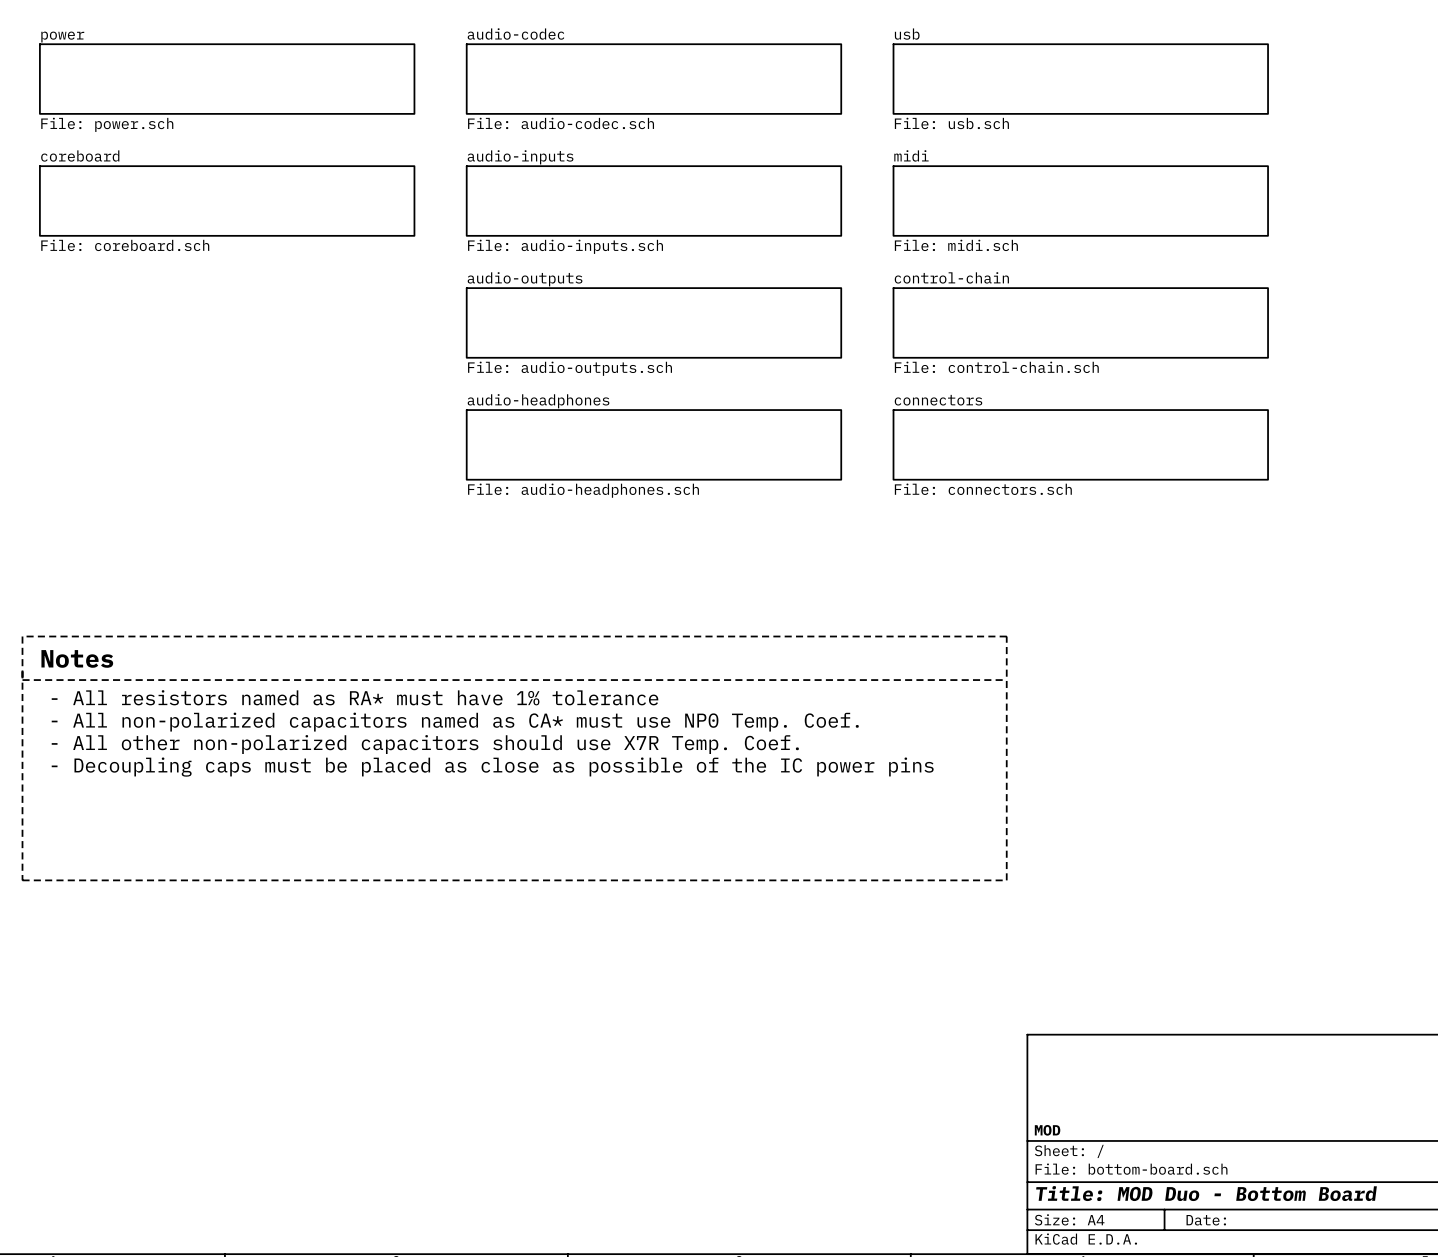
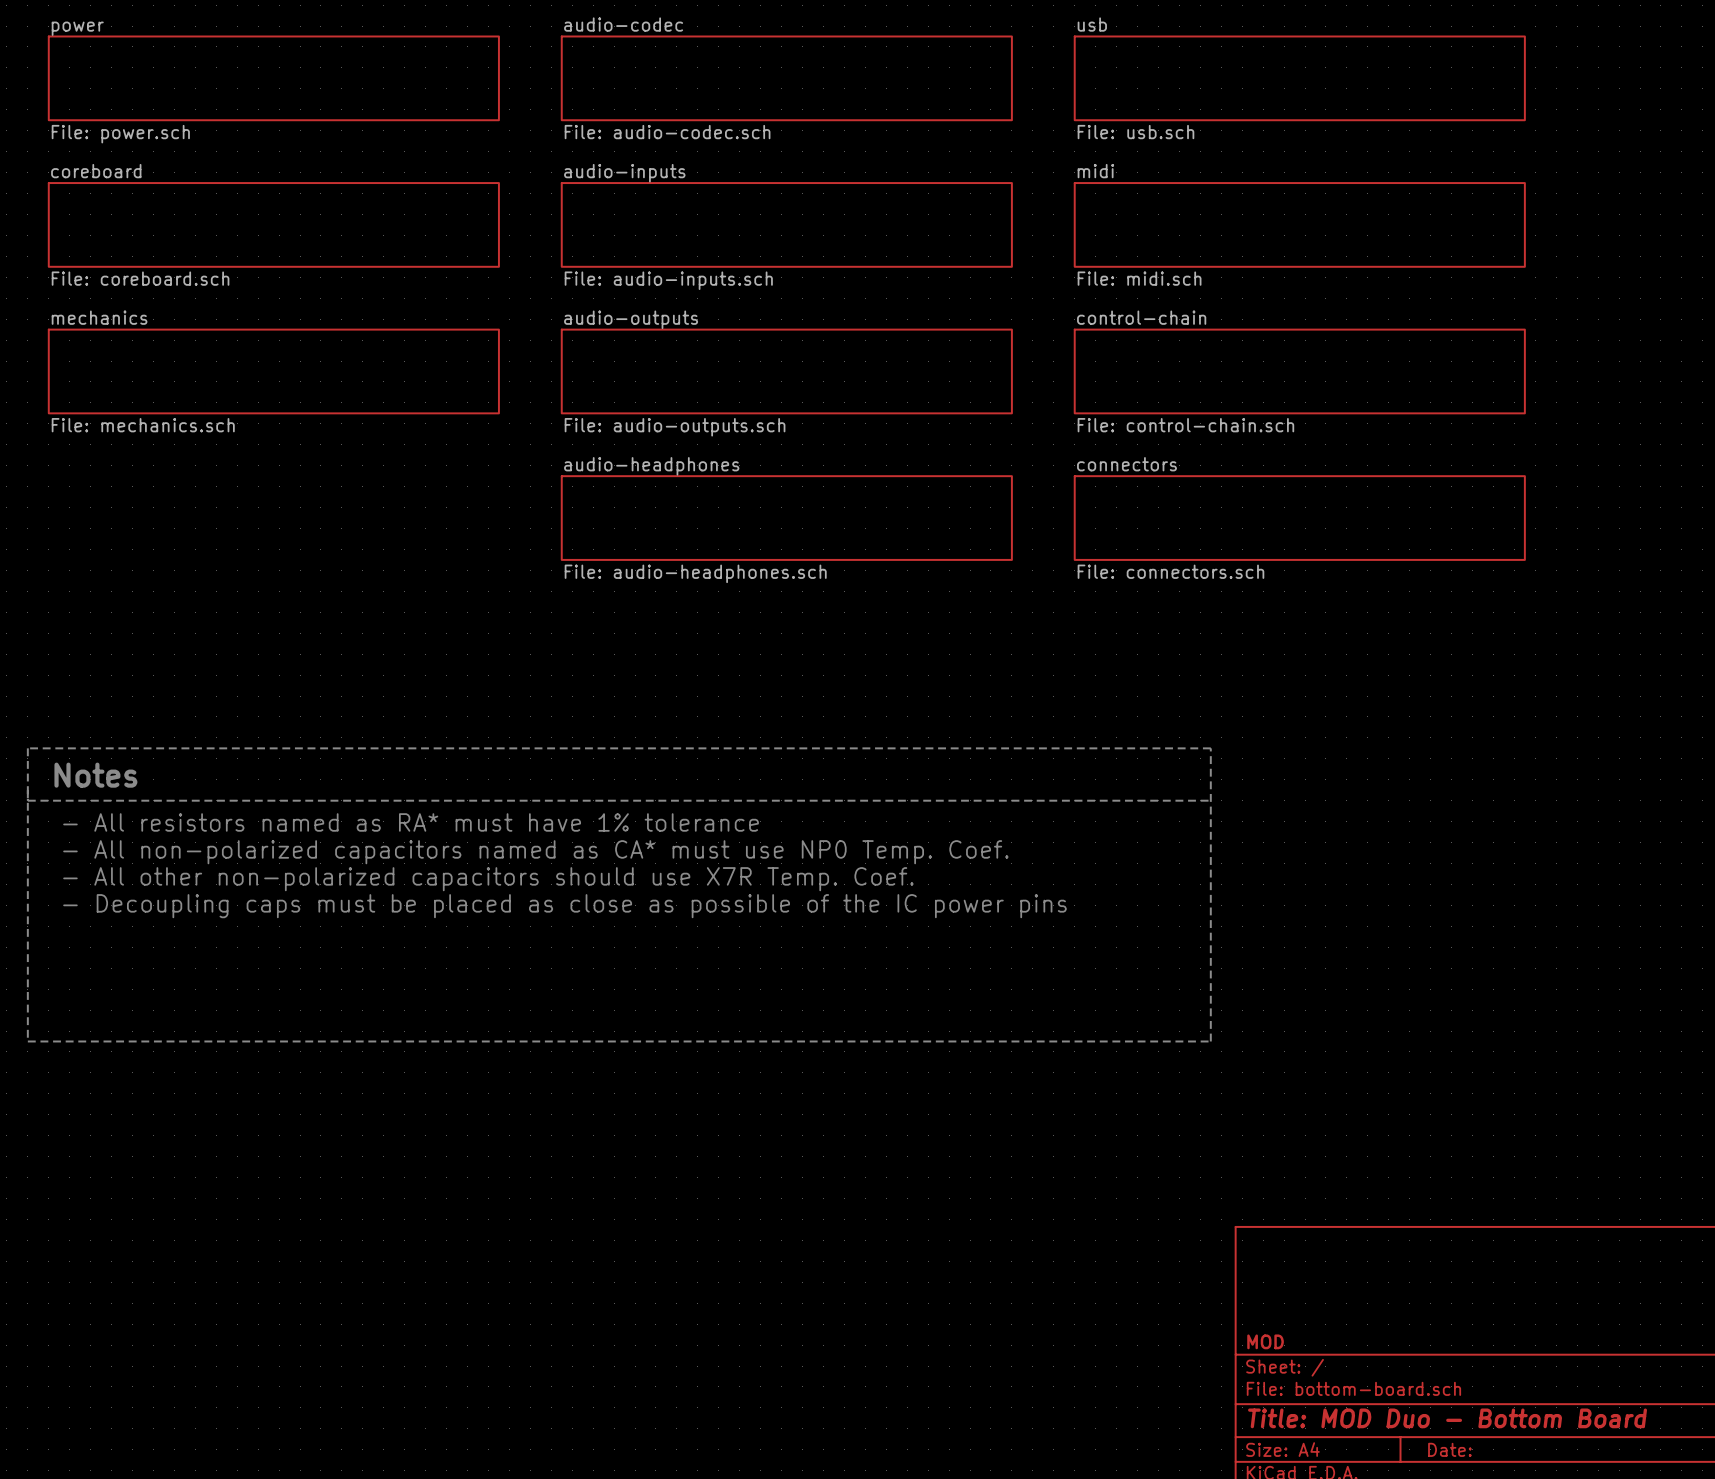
sheet mechanics: none -> File: mechanics.sch (273, 371)

